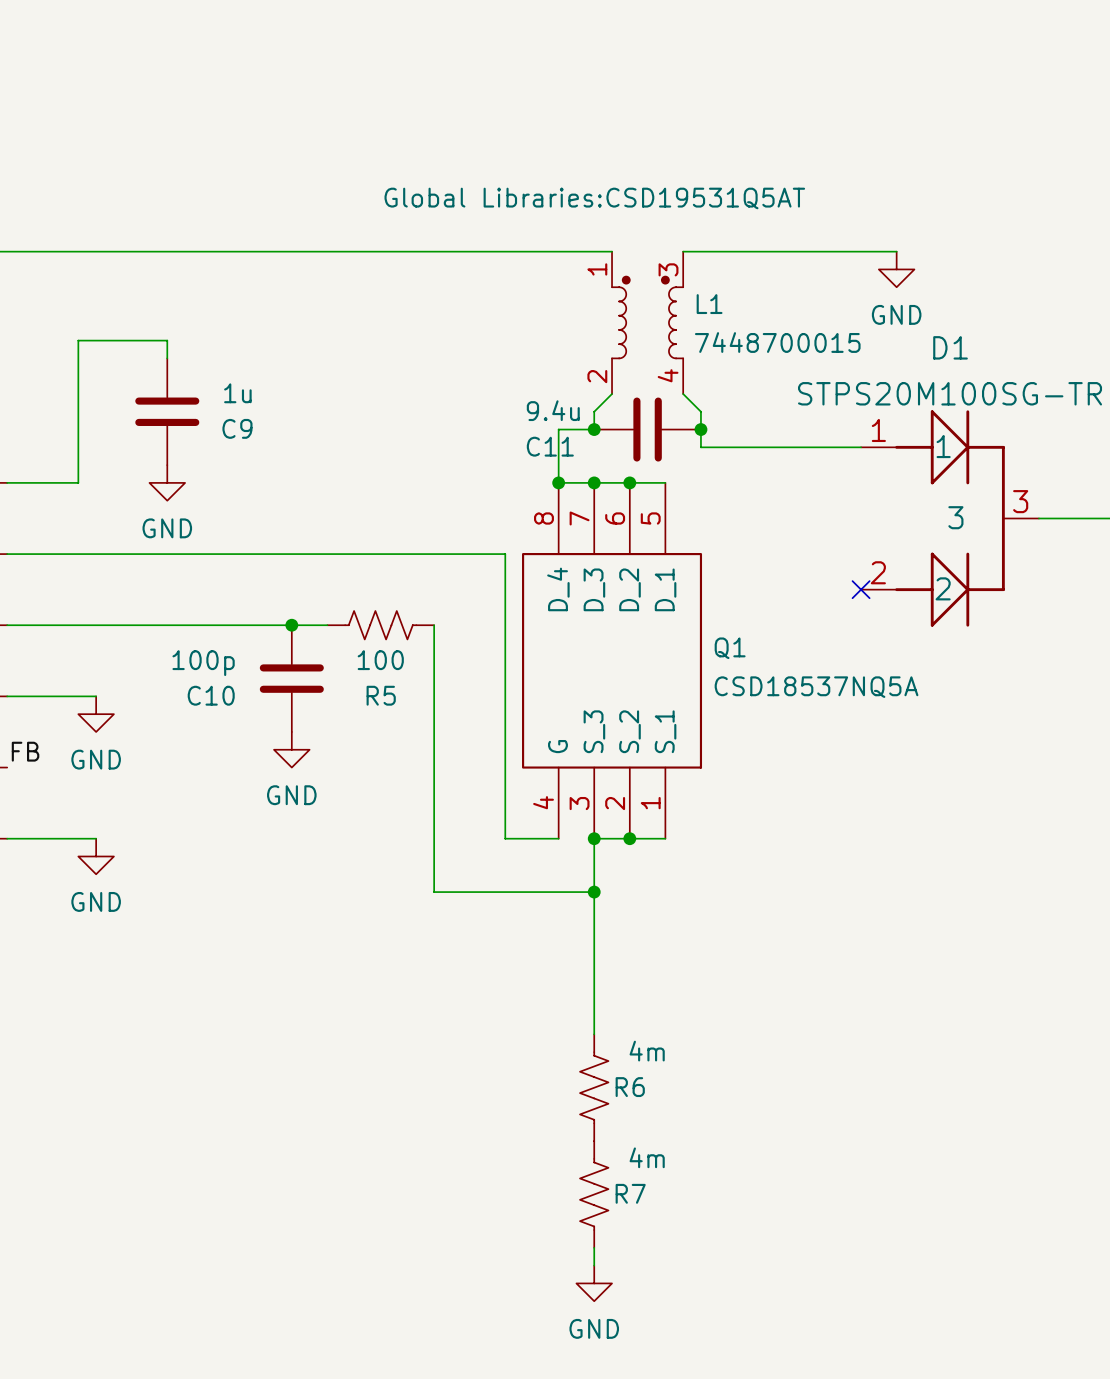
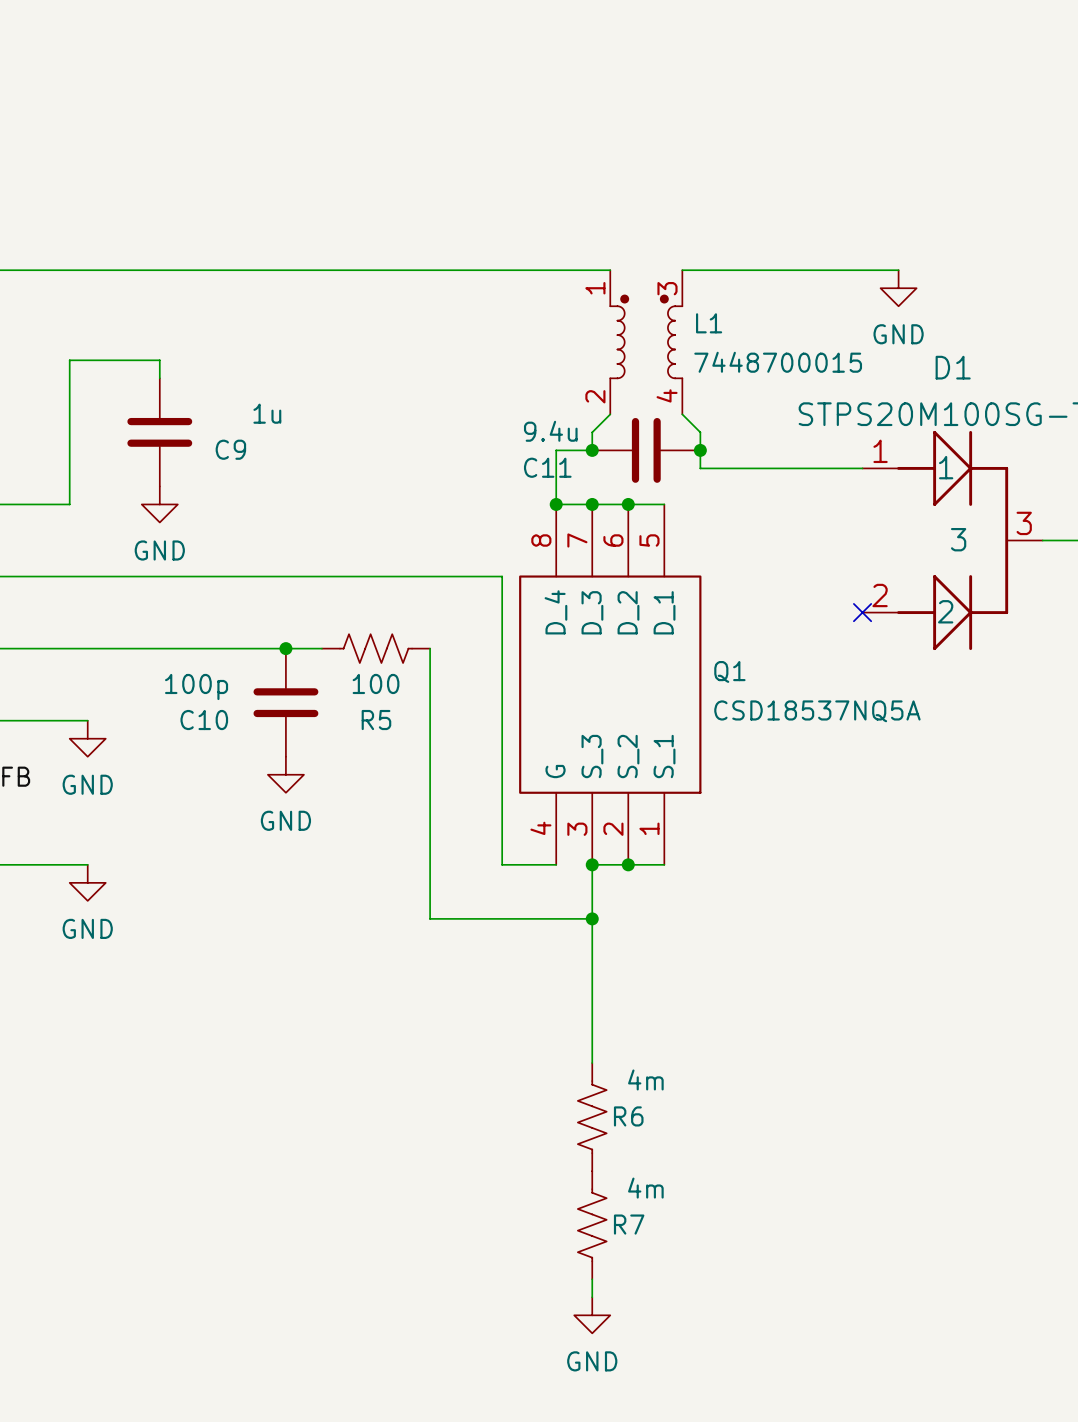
Q1 text: Global Libraries:CSD19531Q5AT (594, 198) -> none
C9 value position: 1u (237, 393) -> 1u (267, 413)

